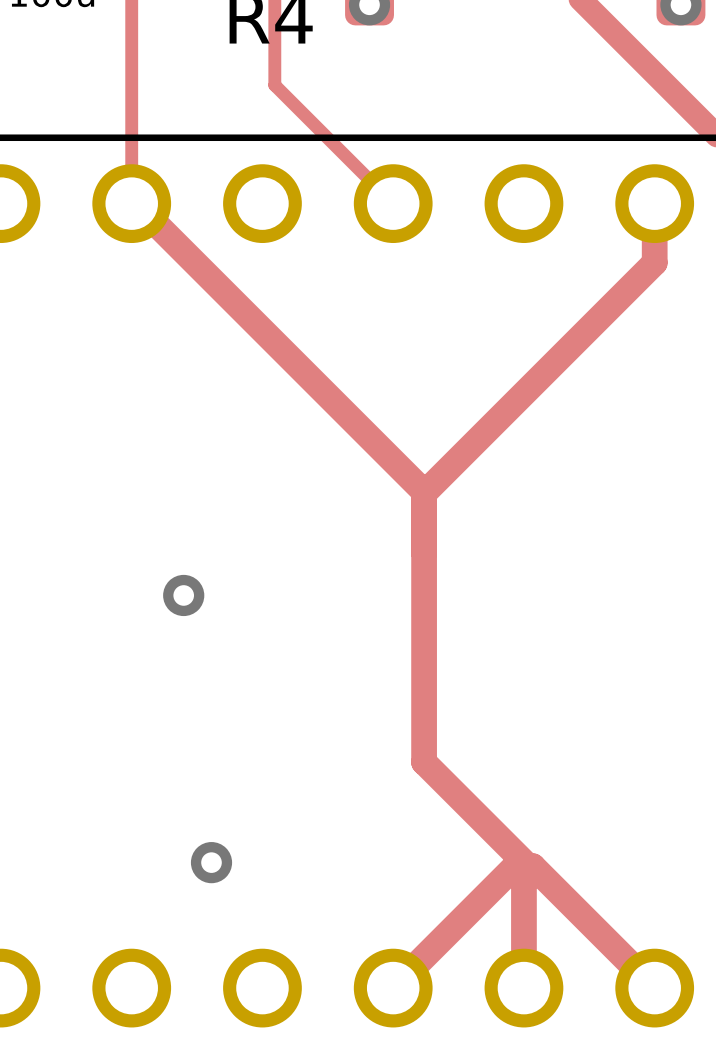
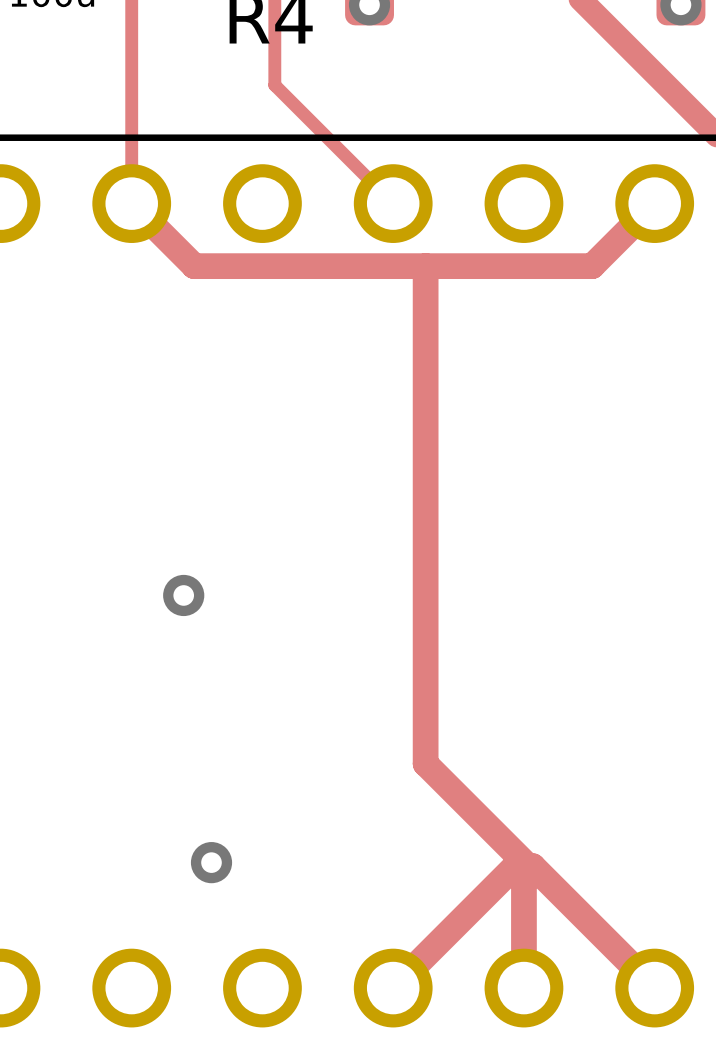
track: (131, 203) (135, 203) (424, 491) (424, 762) (425, 763) -> (425, 266) (425, 763)
track: (654, 203) (654, 262) (424, 493) -> (654, 203) (592, 266) (194, 266) (131, 203)

